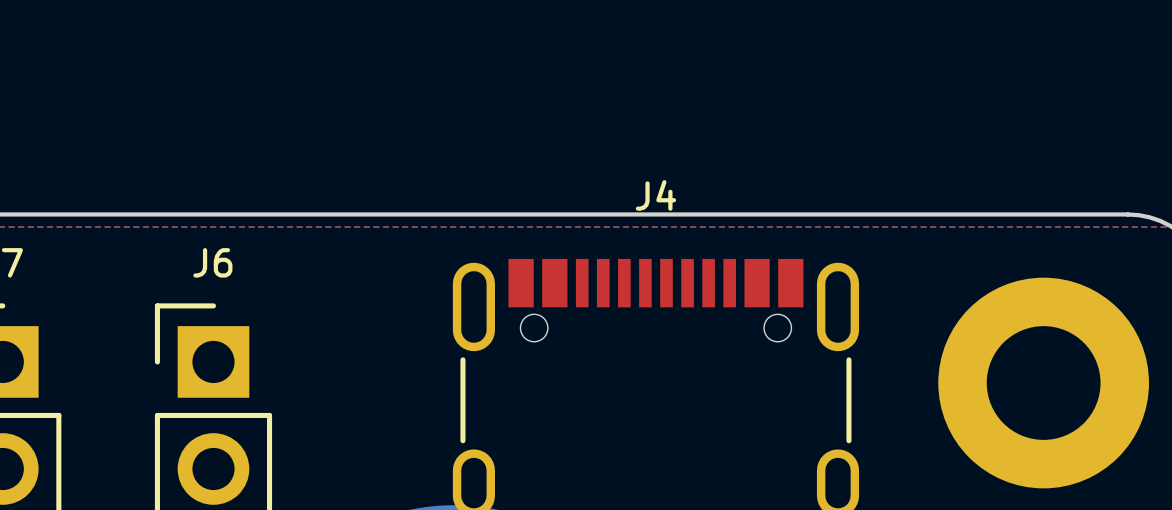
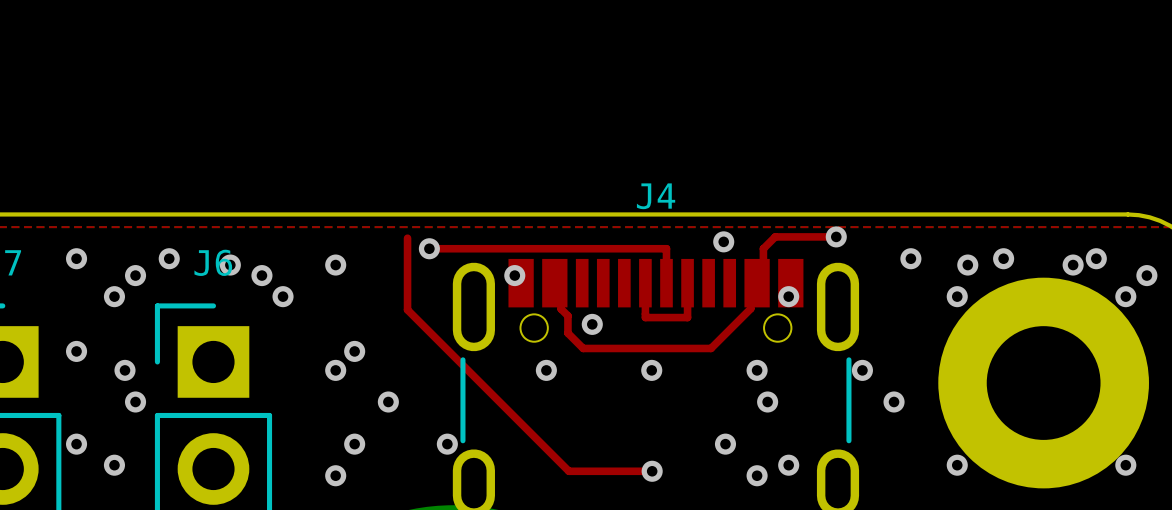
top track: none -> (836, 236) (775, 236) (763, 248) (763, 283) (750, 283) (750, 308) (711, 348) (583, 348) (567, 333) (567, 315) (561, 309) (561, 283) (548, 283)
via: none -> (836, 236)
top track: none -> (407, 238) (407, 309) (568, 471) (652, 471)
via: none -> (723, 241)
top track: none -> (429, 248) (666, 248) (666, 283)
via: none -> (429, 248)
via: none -> (76, 258)
via: none -> (169, 258)
via: none -> (910, 258)
via: none -> (1003, 258)
via: none -> (1096, 258)
via: none -> (230, 265)
via: none -> (335, 265)
via: none -> (967, 265)
via: none -> (1073, 265)
via: none -> (135, 275)
via: none -> (261, 275)
via: none -> (514, 275)
via: none -> (1146, 275)
top track: none -> (645, 283) (645, 317) (687, 317) (687, 283)
via: none -> (114, 296)
via: none -> (283, 296)
via: none -> (788, 296)
via: none -> (957, 296)
via: none -> (1125, 296)
via: none -> (592, 324)
via: none -> (76, 351)
via: none -> (354, 351)
via: none -> (124, 370)
via: none -> (335, 370)
via: none -> (546, 370)
via: none -> (651, 370)
via: none -> (757, 370)
via: none -> (862, 370)
via: none -> (135, 401)
via: none -> (388, 401)
via: none -> (767, 401)
via: none -> (894, 401)
via: none -> (76, 444)
via: none -> (354, 444)
via: none -> (447, 444)
via: none -> (725, 444)
via: none -> (114, 465)
via: none -> (788, 465)
via: none -> (957, 465)
via: none -> (1125, 465)
via: none -> (652, 471)
via: none -> (335, 475)
via: none -> (757, 475)

